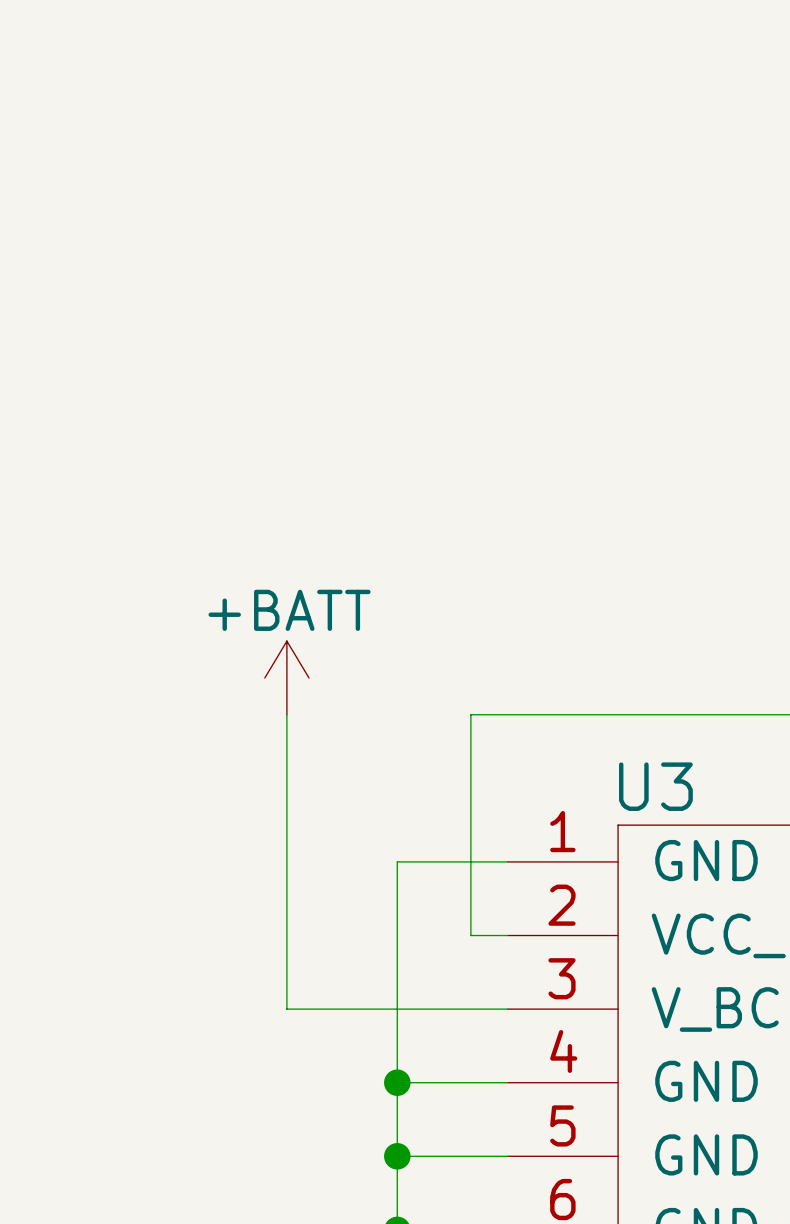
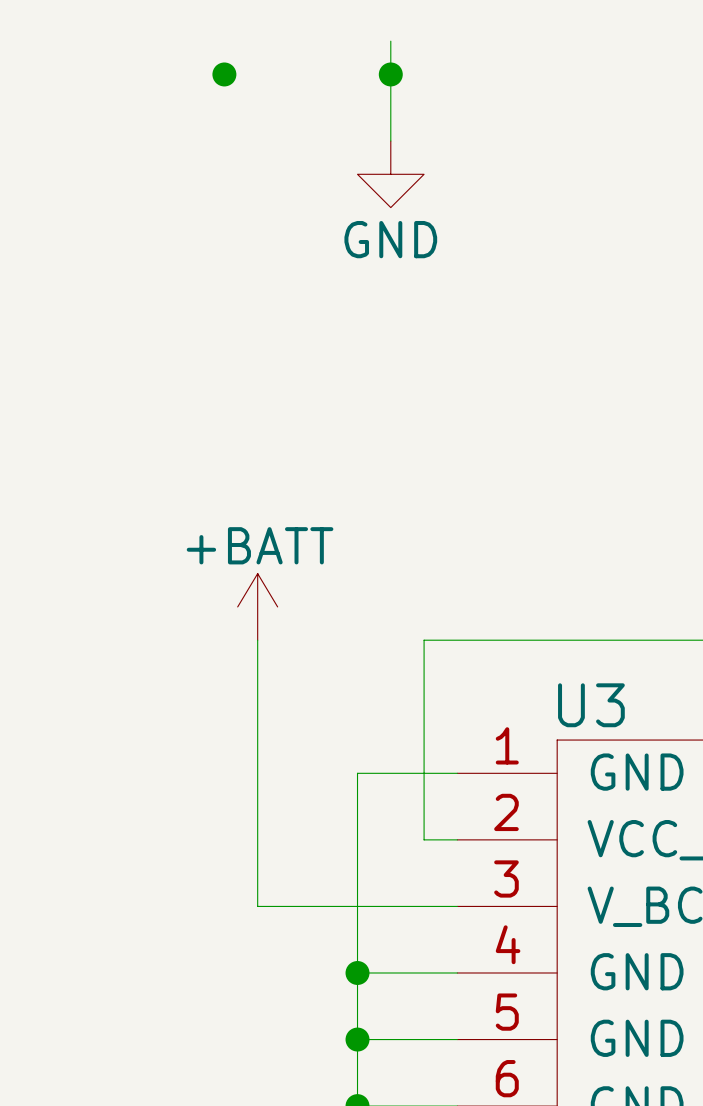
wire: none -> (390, 41) (390, 141)
junction: none -> (224, 74)
junction: none -> (390, 74)
power symbol: none -> GND (390, 174)

